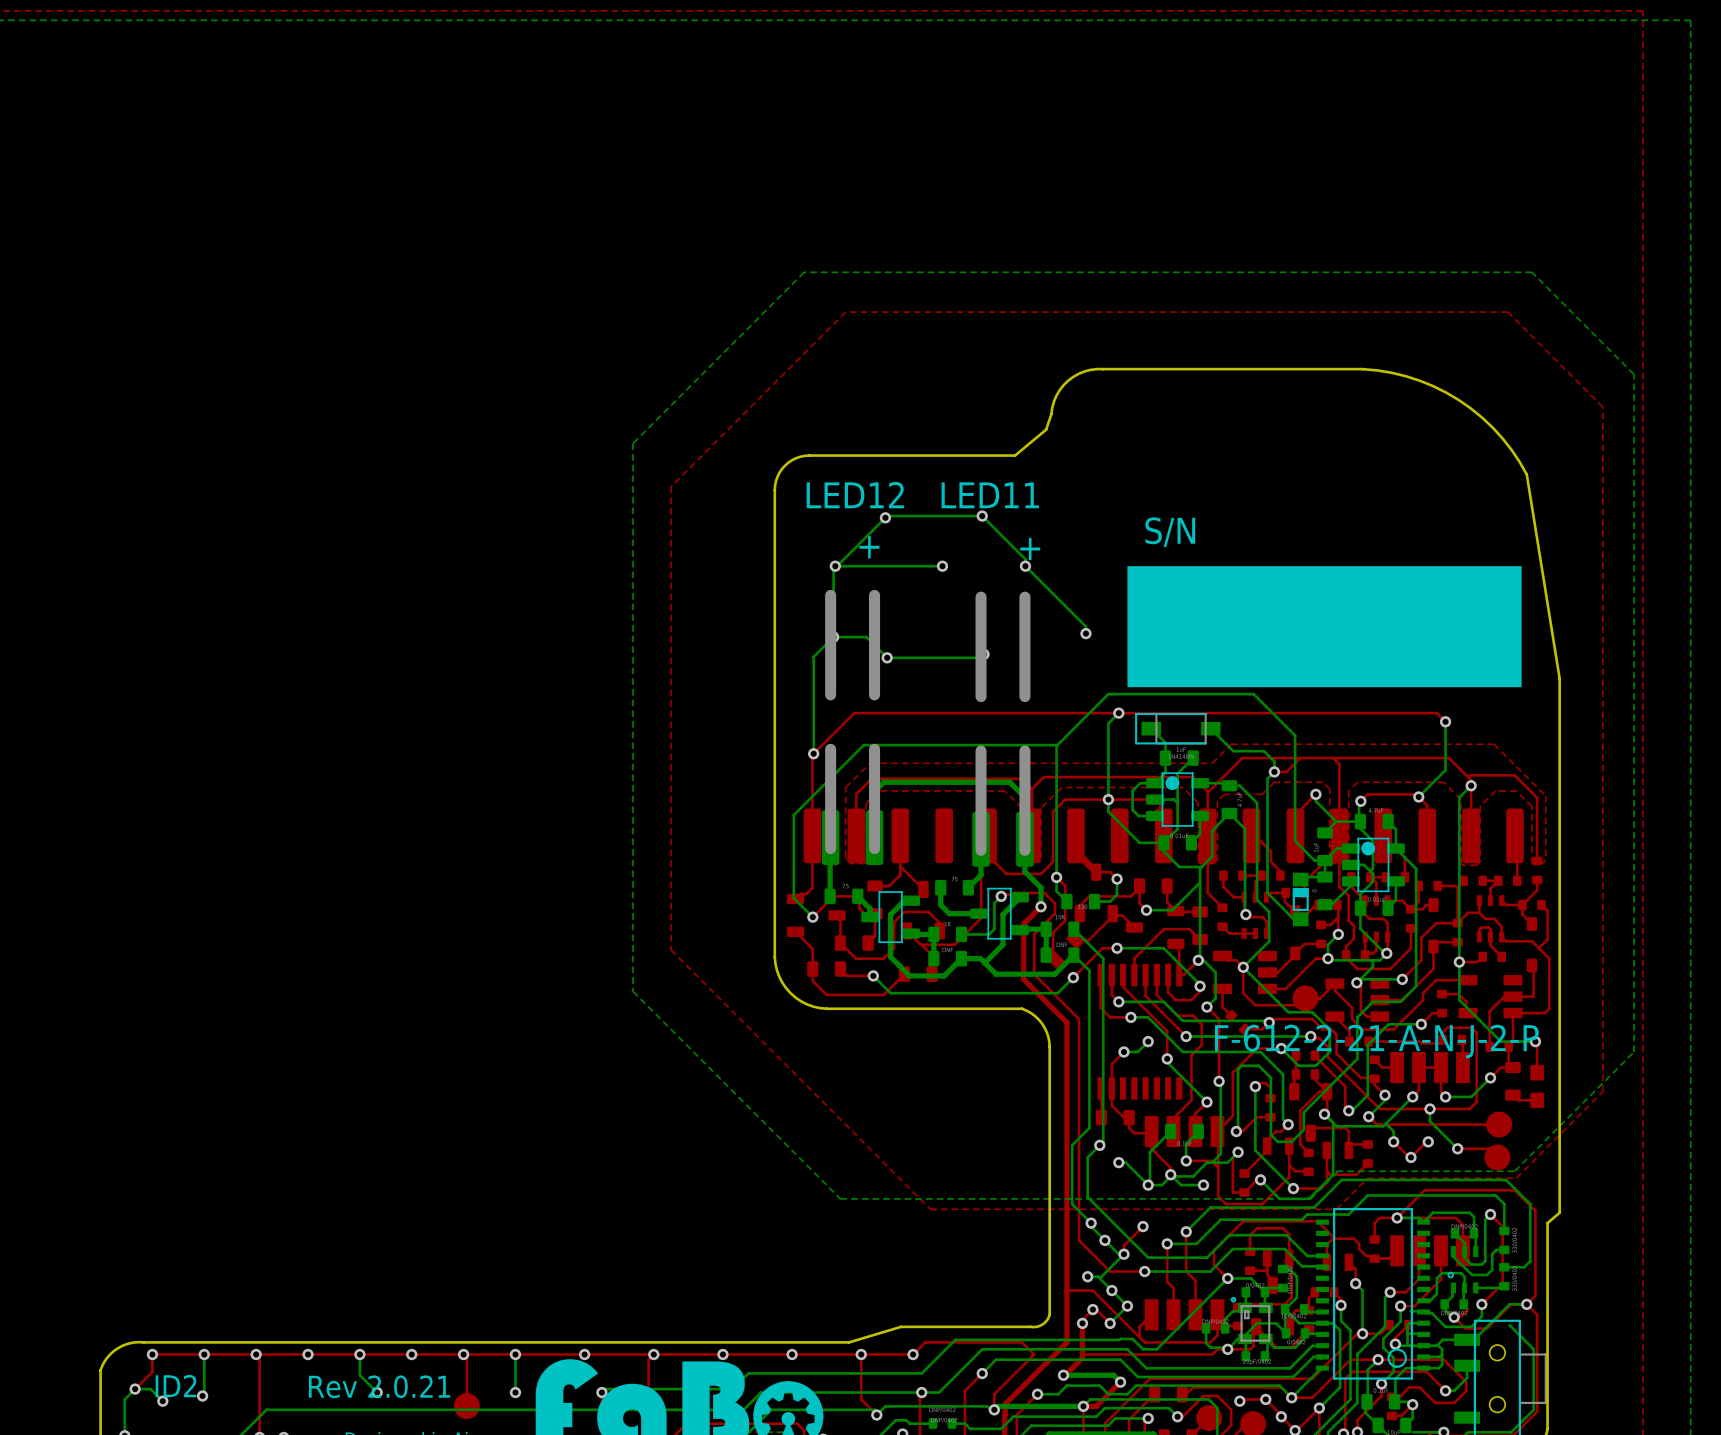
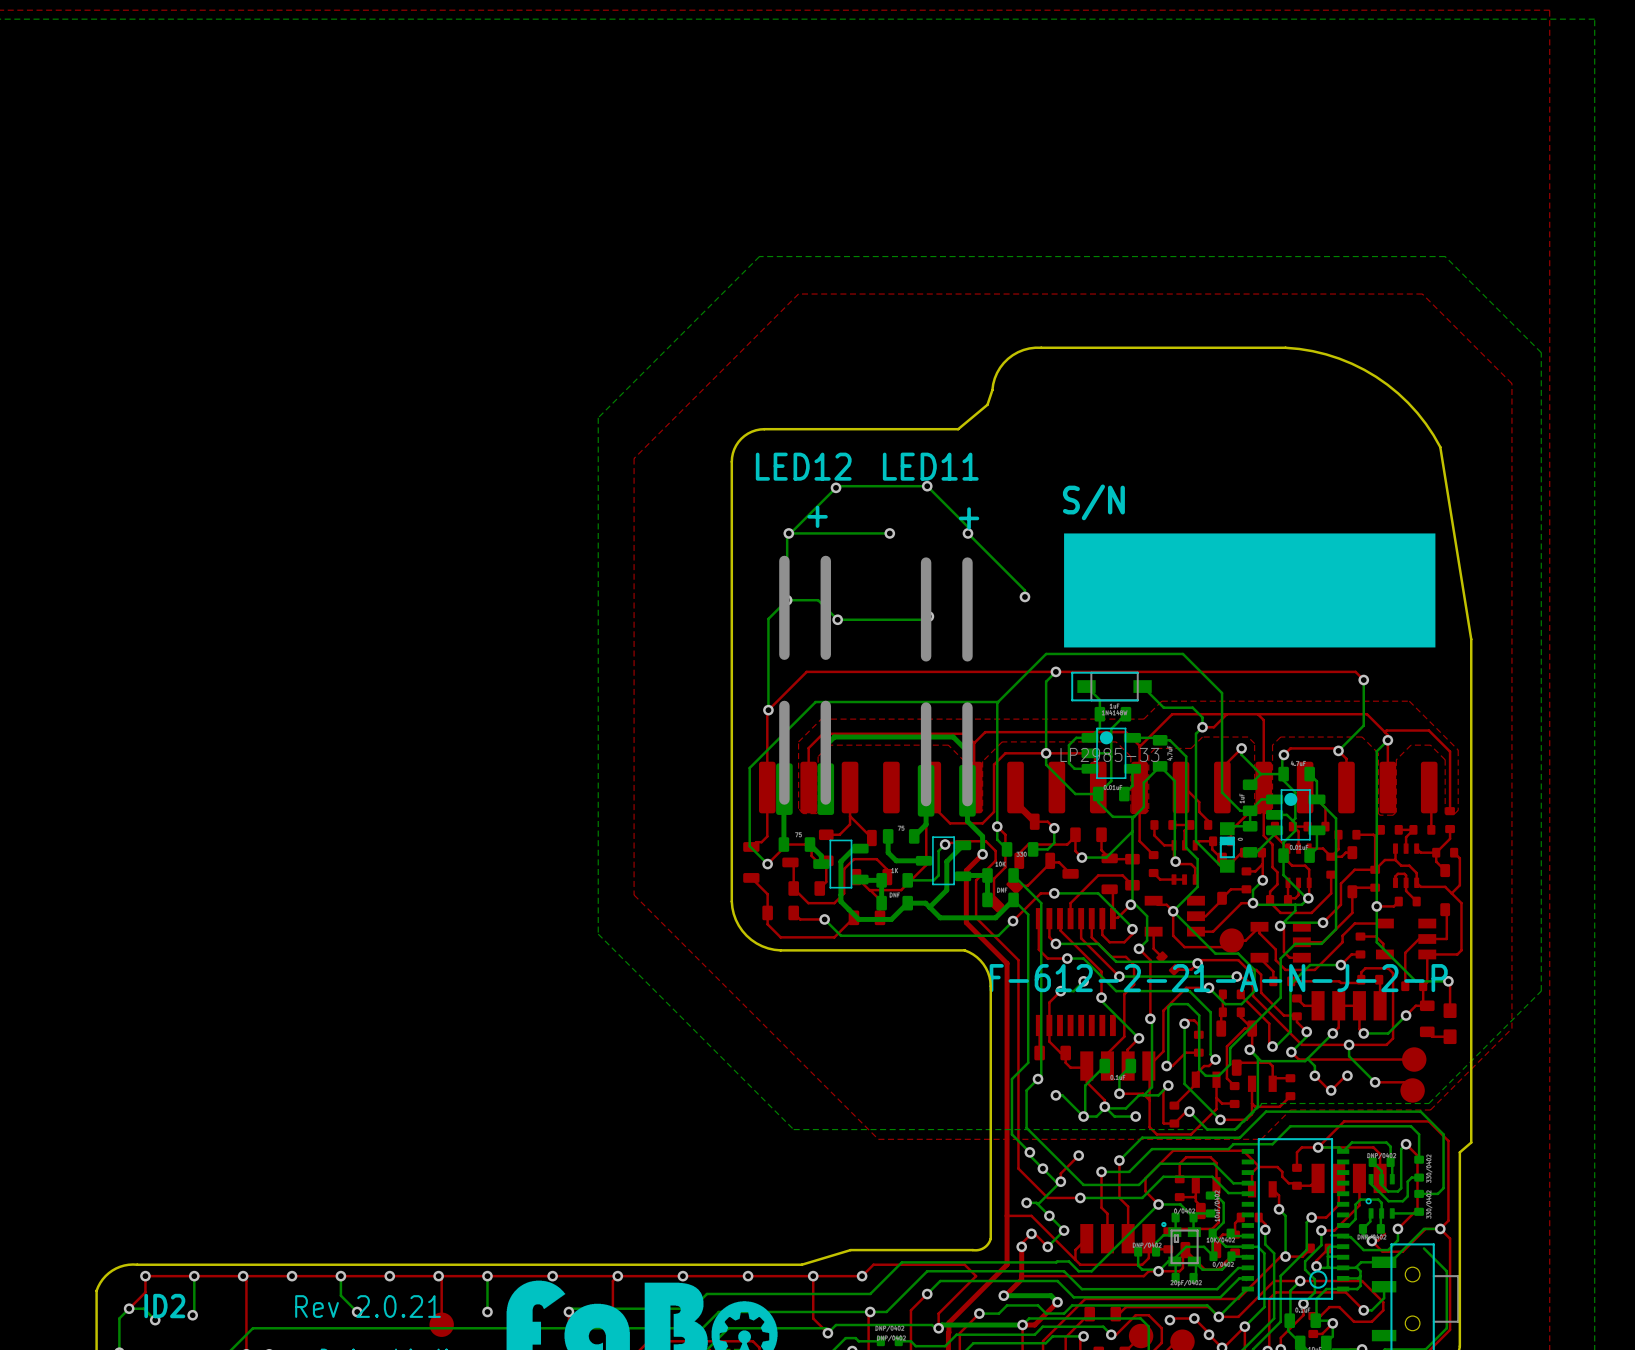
text: none -> LP2985-33 (1109, 754)

